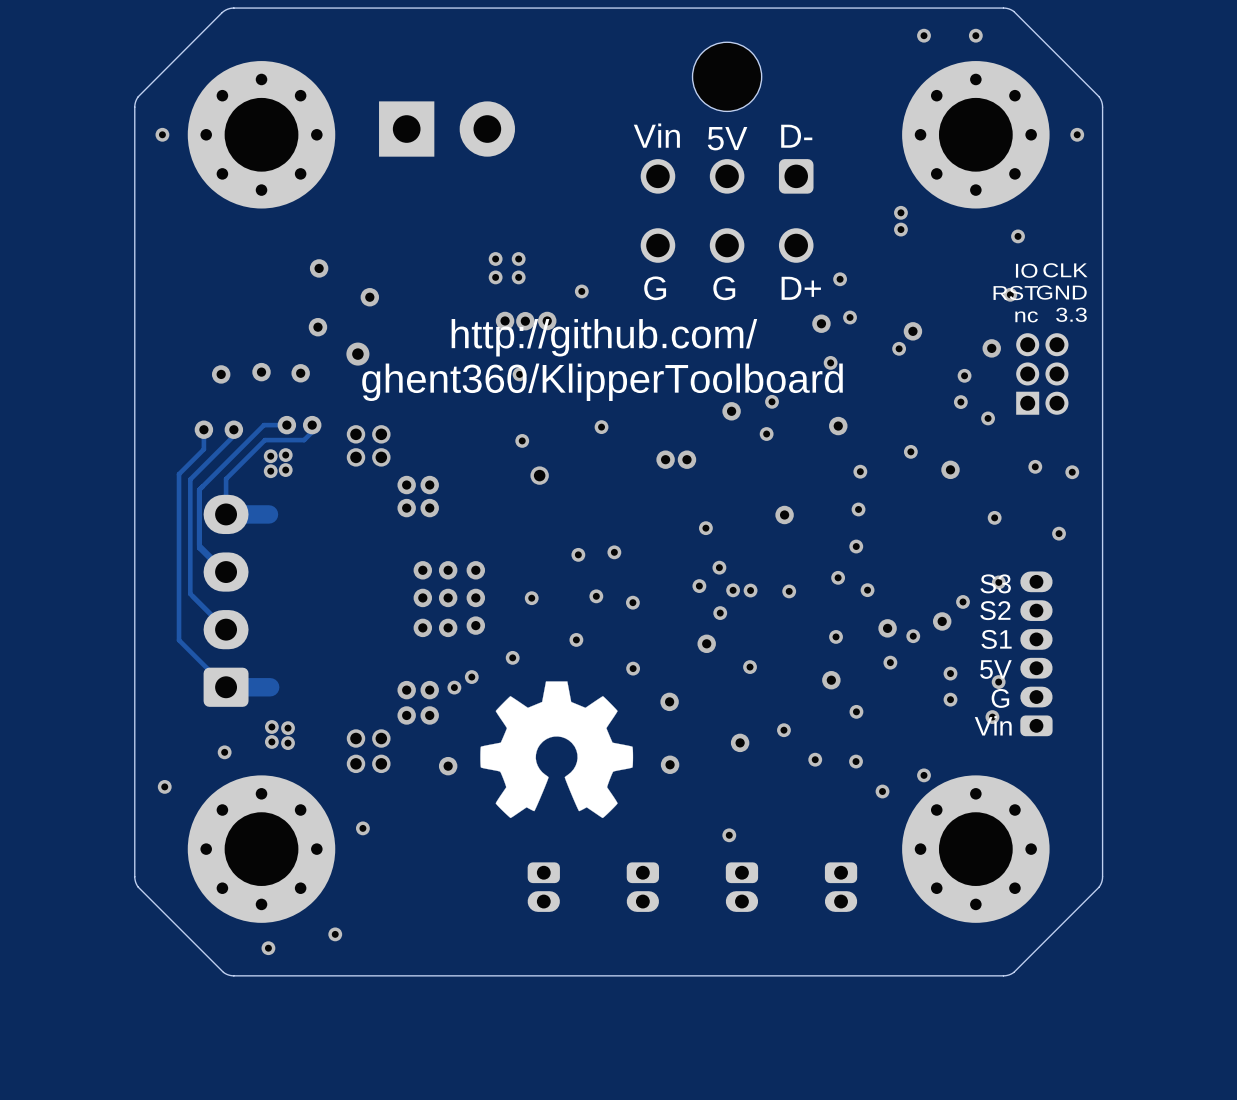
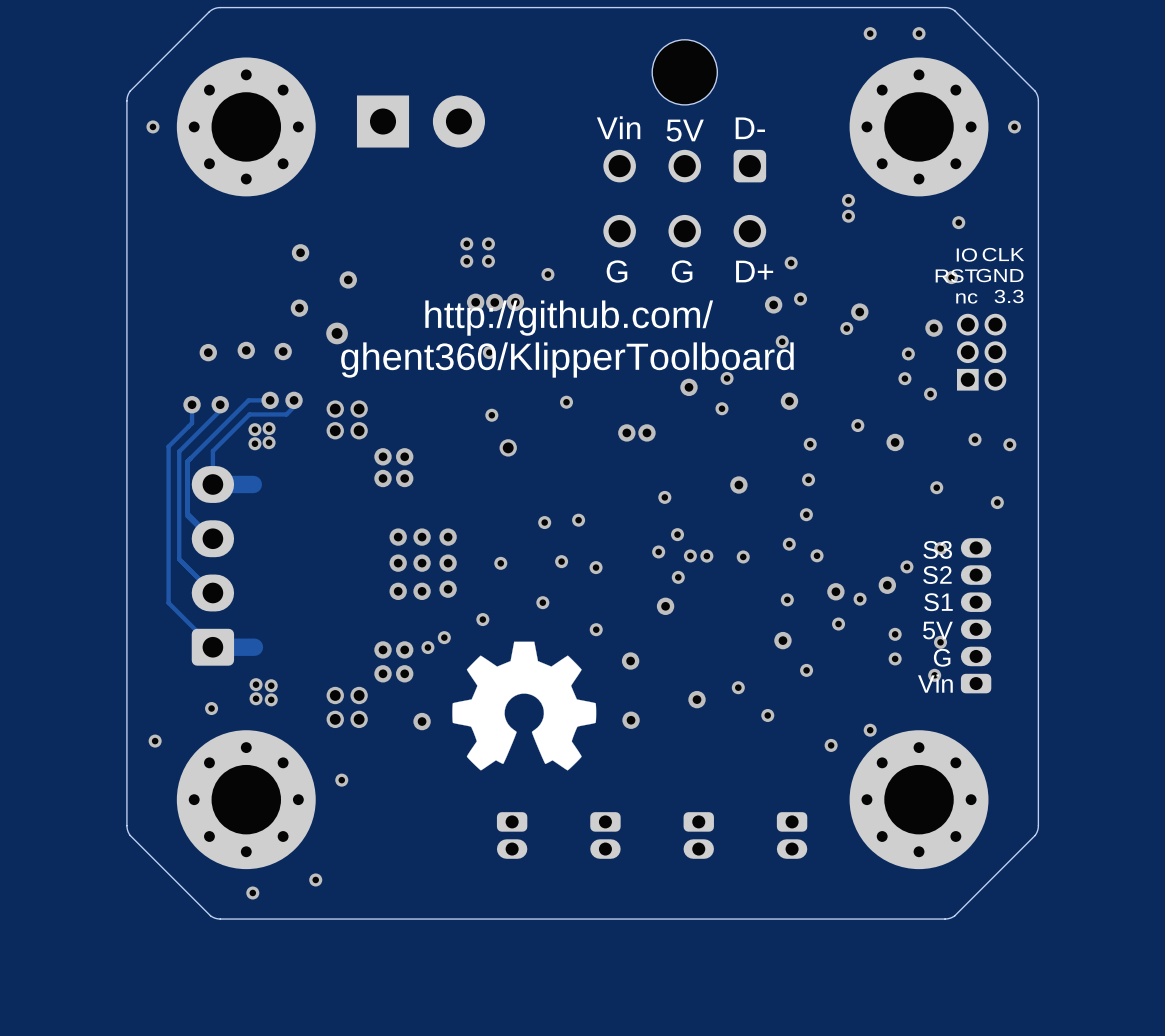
via: (750, 667) -> none
via: (856, 761) -> none
via: (729, 835) -> none

